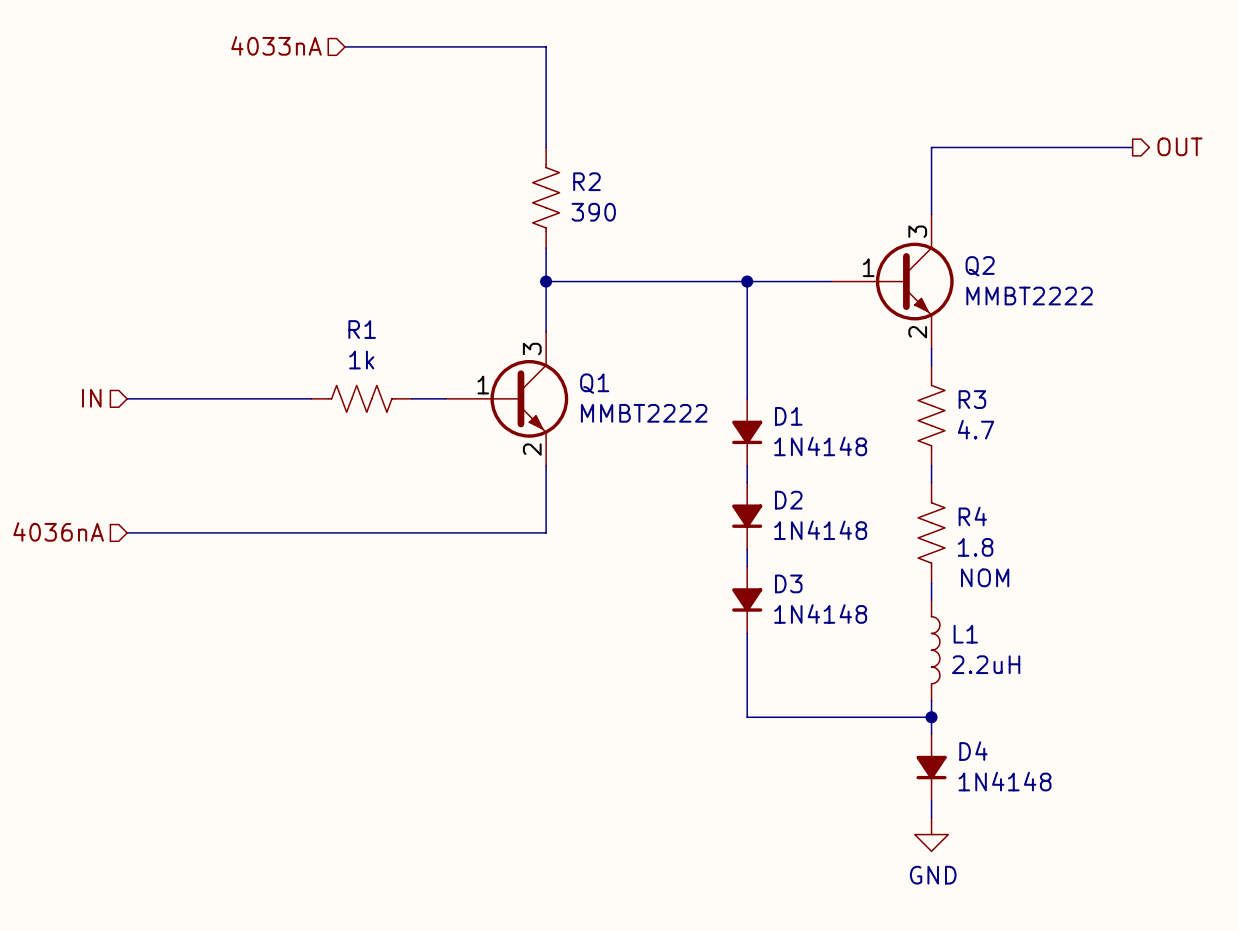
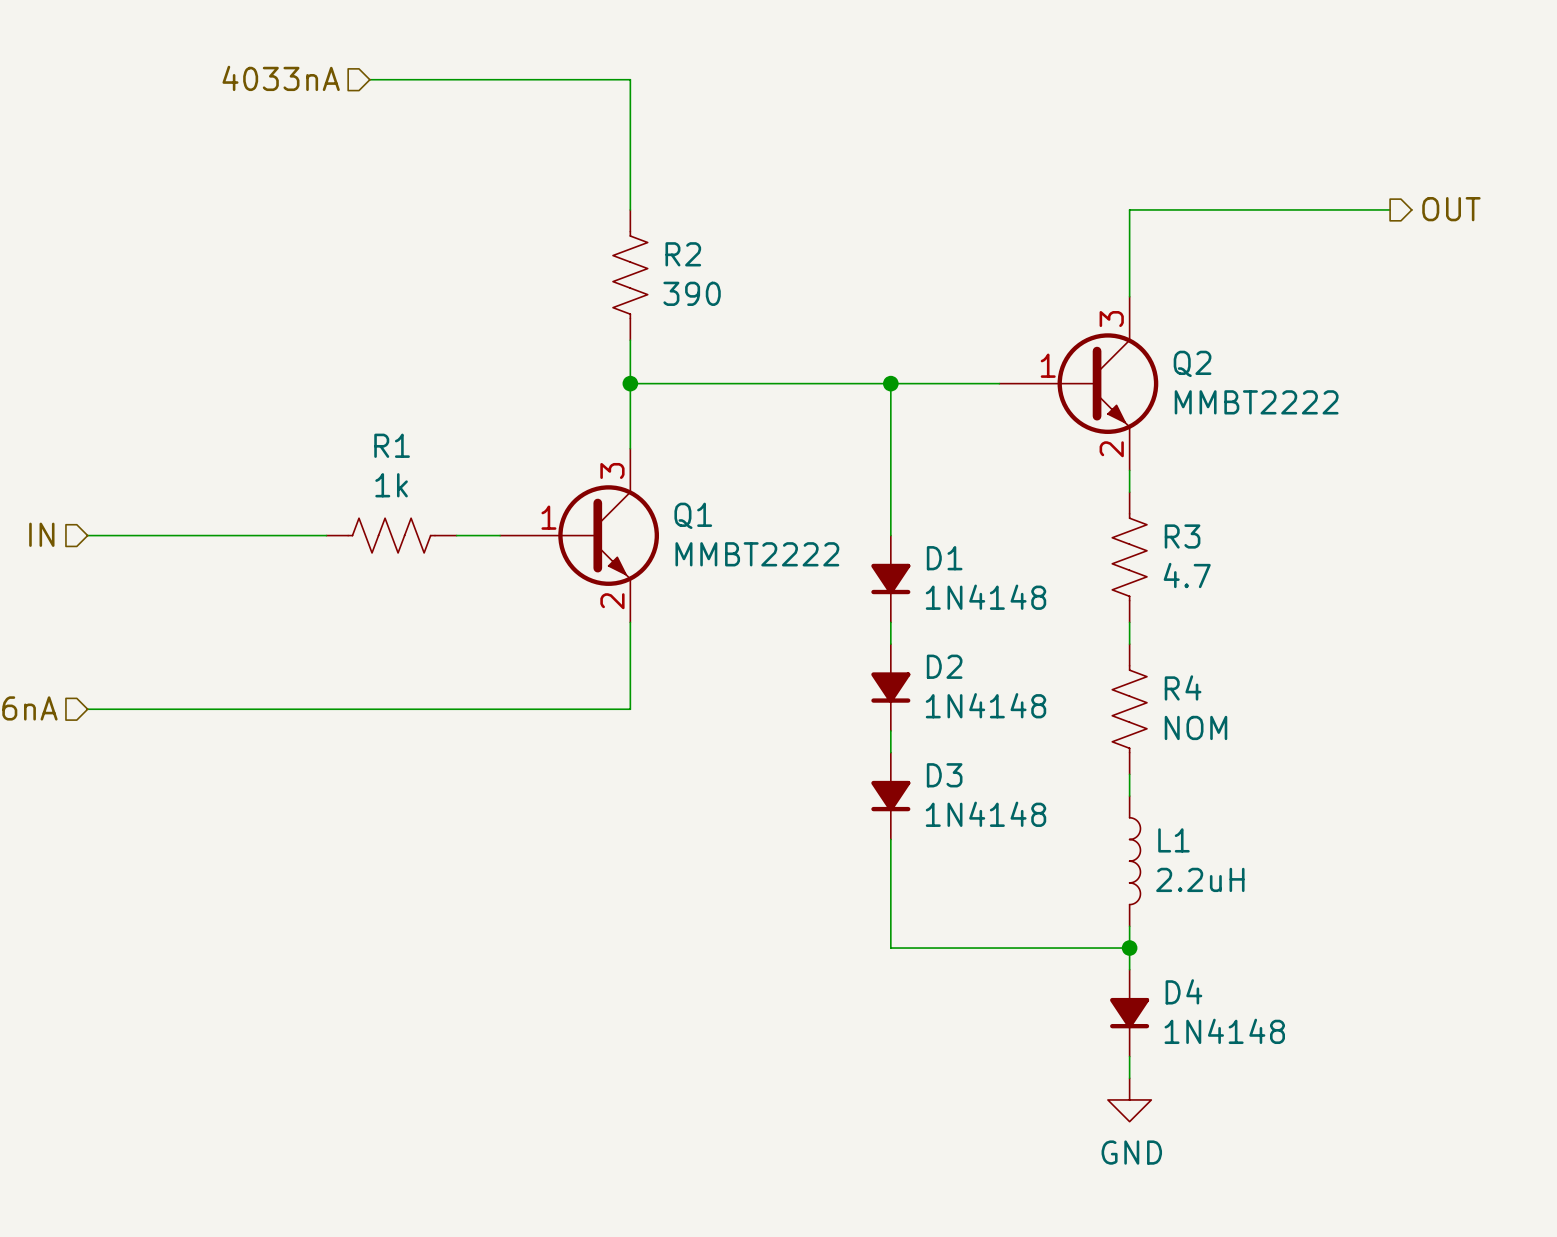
R4 value: 1.8 (975, 547) -> NOM (1195, 727)
text: NOM (985, 577) -> none

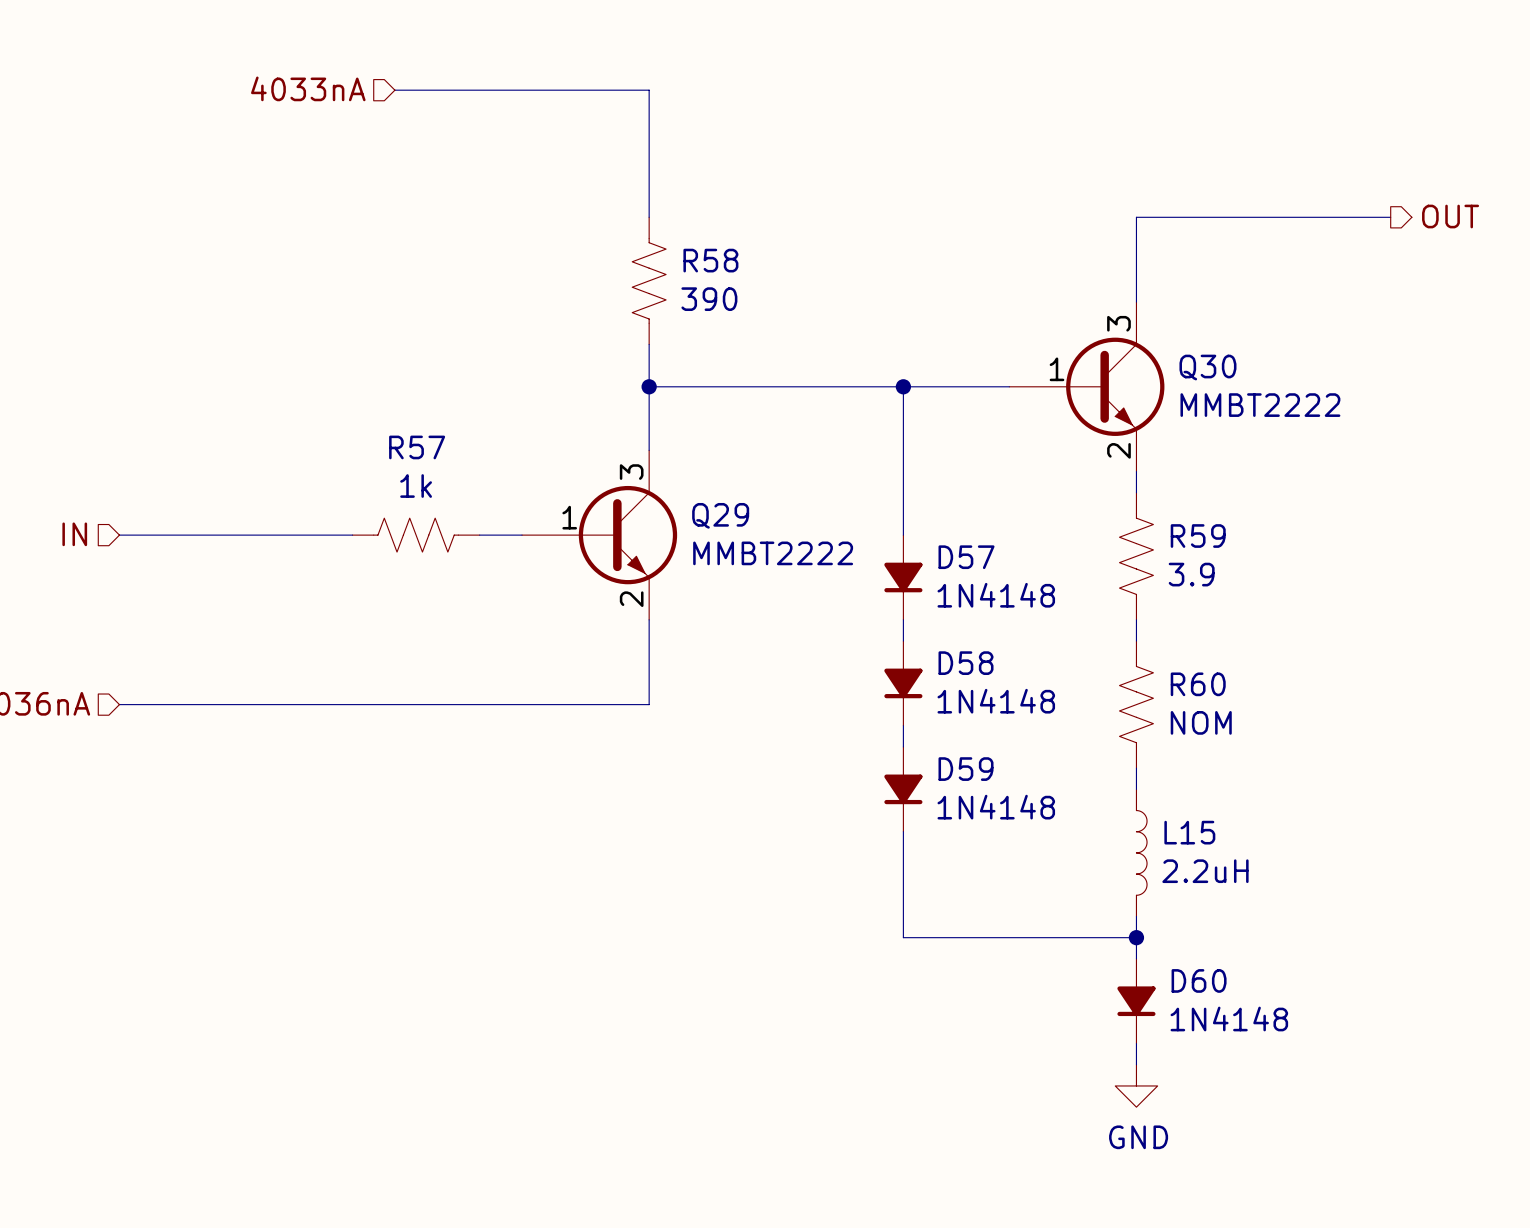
R2 name: R2 (683, 254) -> R58 (710, 260)
Q2 name: Q2 (1192, 363) -> Q30 (1207, 367)
R1 name: R1 (392, 445) -> R57 (417, 447)
Q1 name: Q1 (693, 515) -> Q29 (720, 515)
R3 name: R3 (1182, 536) -> R59 (1198, 536)
D1 name: D1 (944, 558) -> D57 (966, 557)
R3 value: 4.7 (1187, 575) -> 3.9 (1191, 574)
D2 name: D2 (944, 666) -> D58 (966, 663)
R4 name: R4 (1183, 687) -> R60 (1198, 684)
D3 name: D3 (944, 775) -> D59 (966, 769)
L1 name: L1 (1173, 840) -> L15 (1189, 832)
D4 name: D4 (1183, 991) -> D60 (1199, 980)

